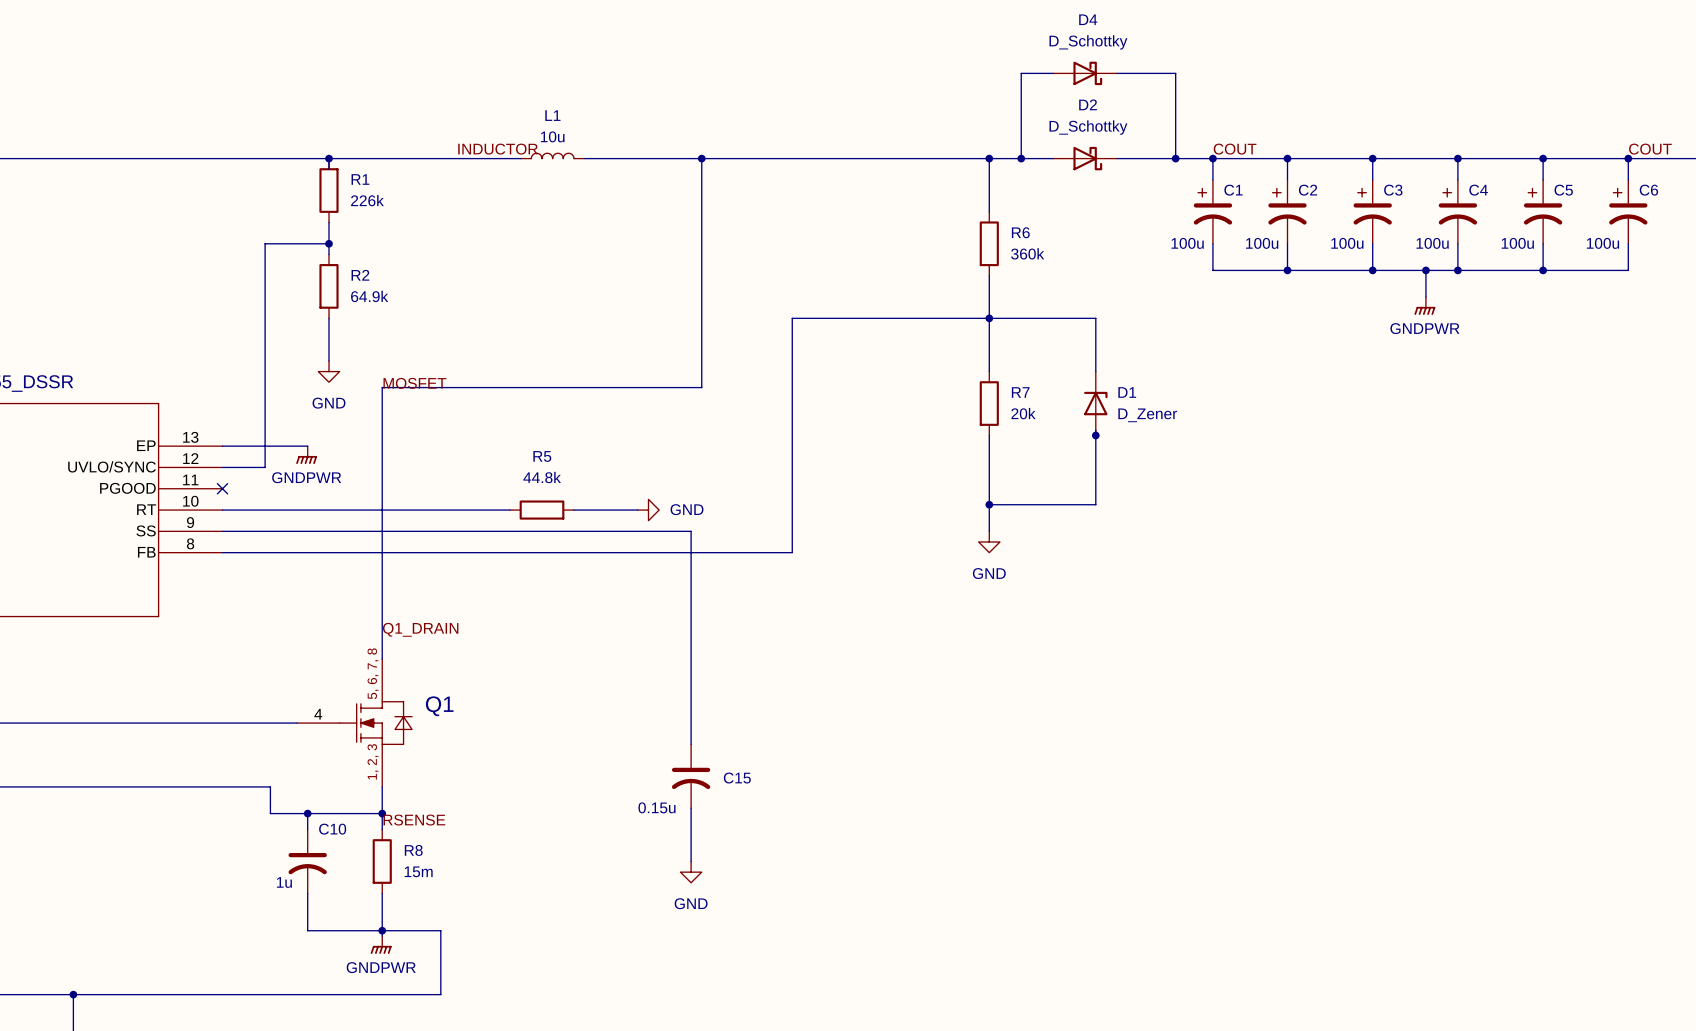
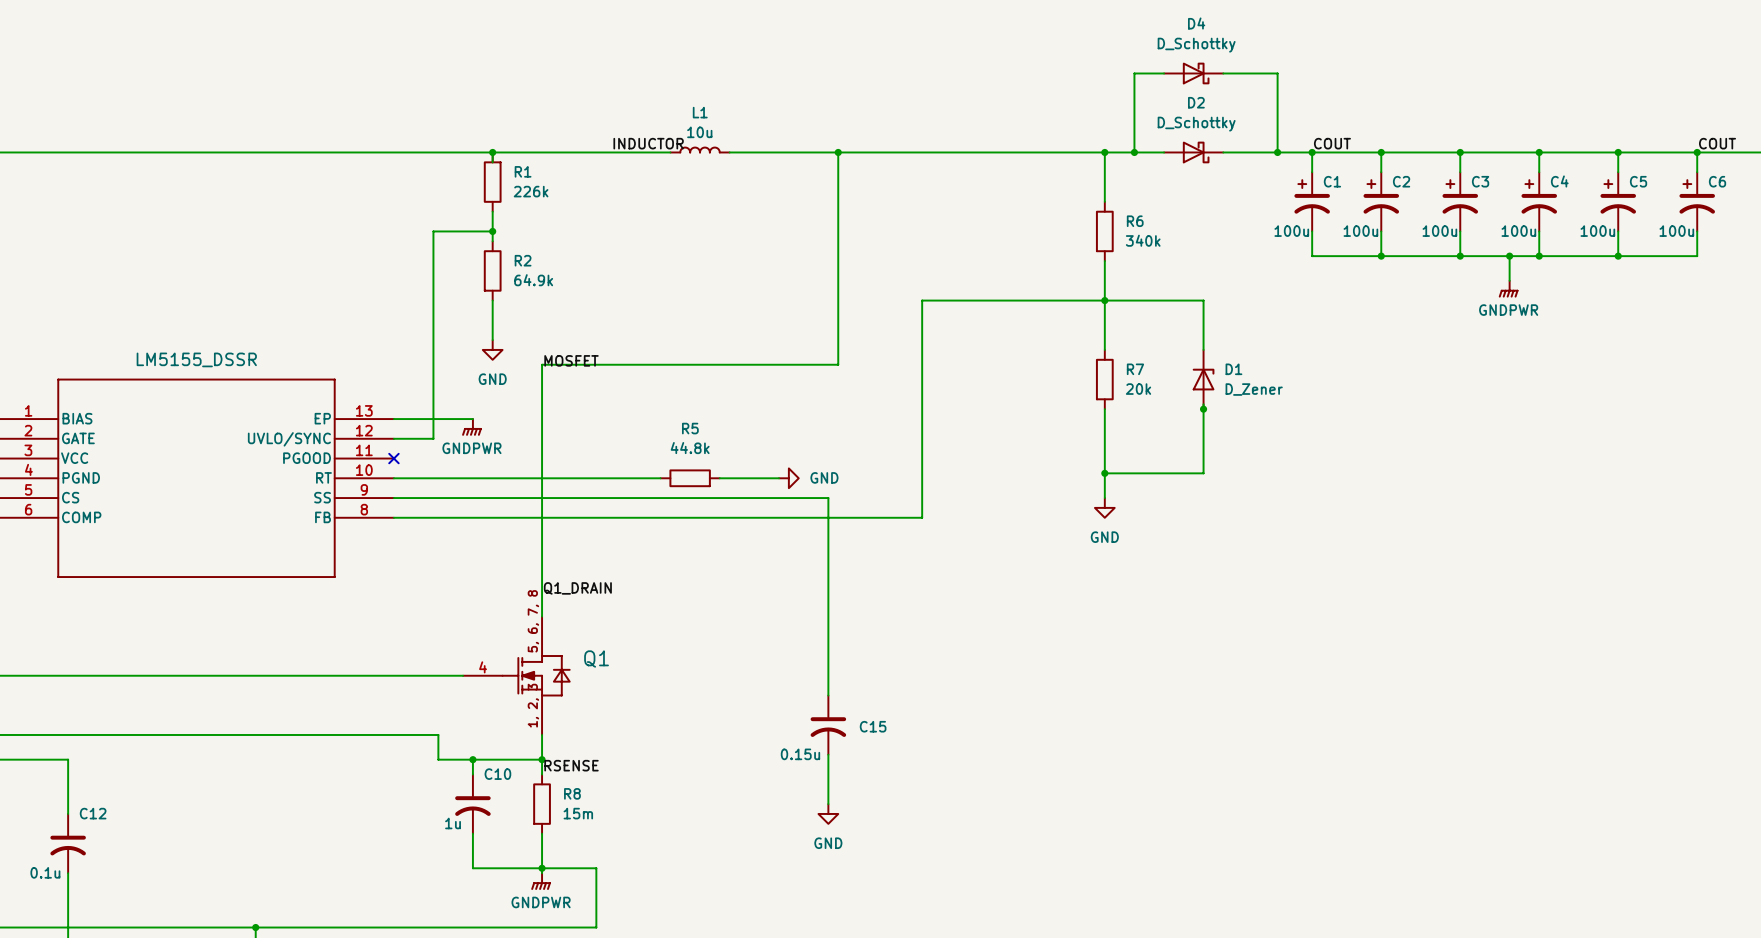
R6 value: 360k (1027, 253) -> 340k (1143, 240)

